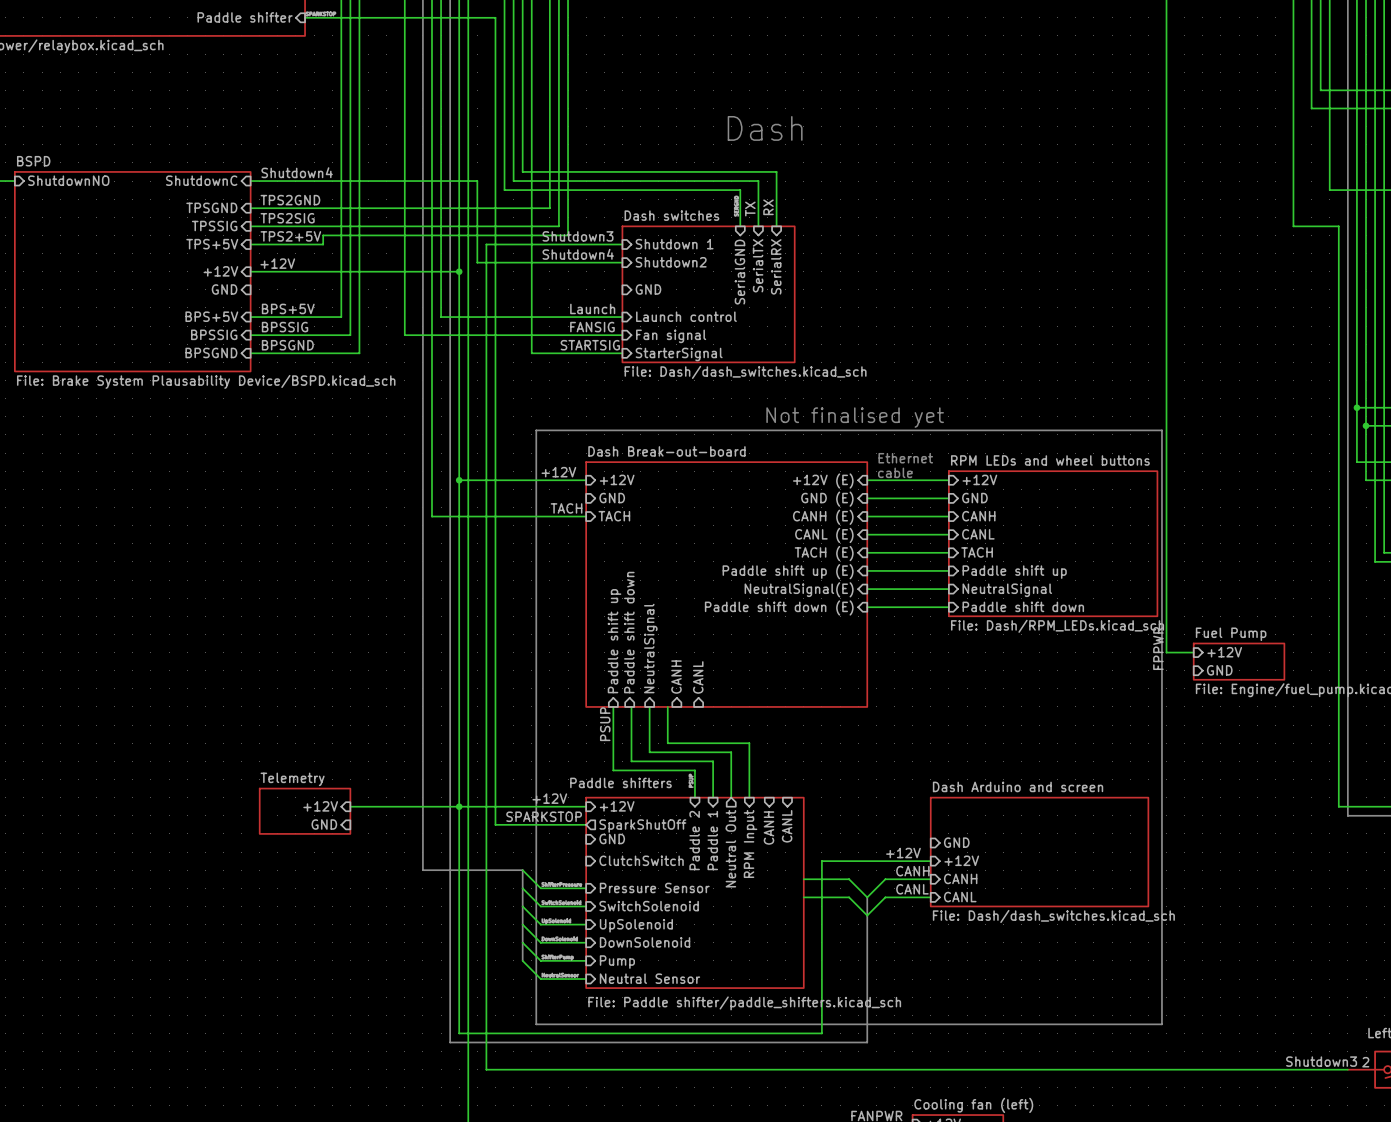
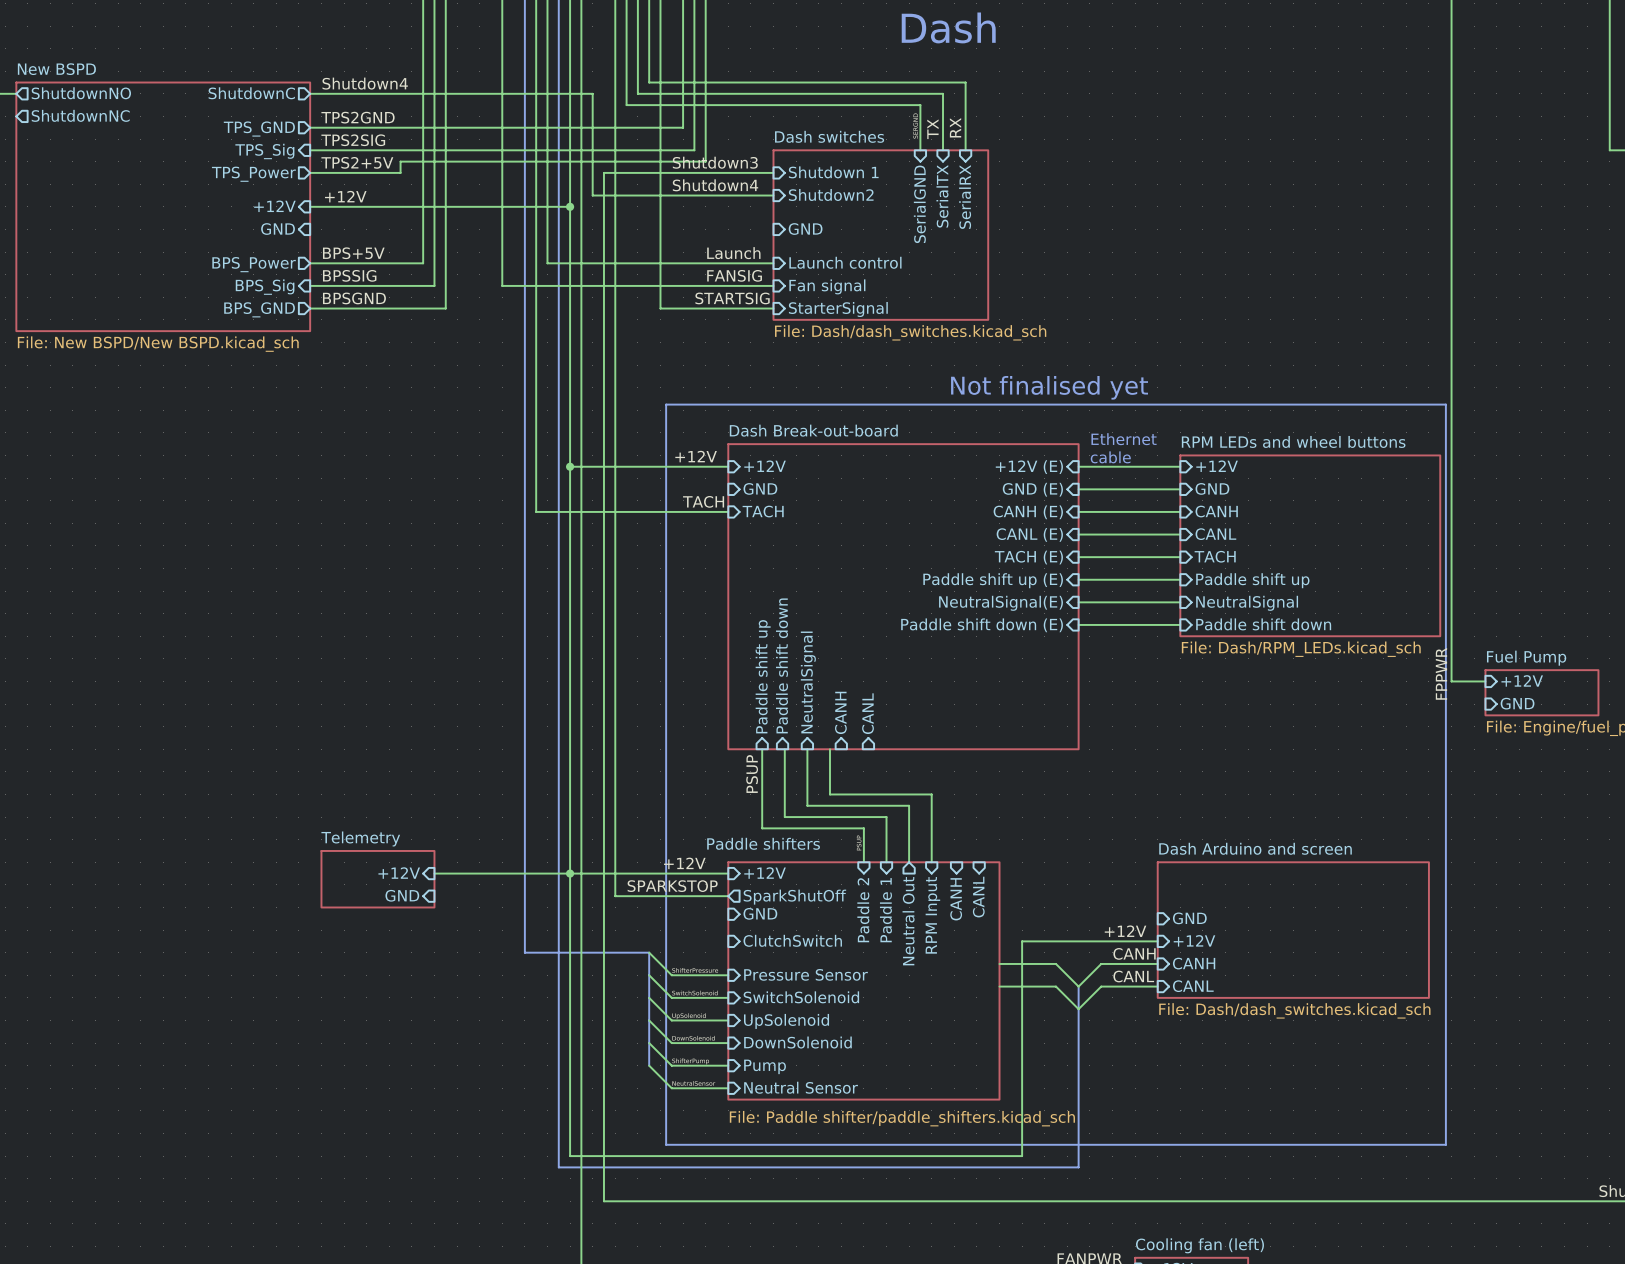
sheet BSPD name: BSPD (33, 161) -> New BSPD (56, 69)
sheet pin shape: input (68, 180) -> output (81, 93)
sheet pin shape: input (201, 180) -> output (251, 93)
sheet pin: none -> ShutdownNC (80, 115)
sheet pin shape: input (211, 207) -> output (259, 129)
sheet pin: TPSGND (211, 207) -> TPS_GND (259, 129)
sheet pin: TPSSIG (214, 226) -> TPS_Sig (264, 151)
sheet pin shape: input (212, 244) -> output (253, 174)
sheet pin: TPS+5V (212, 244) -> TPS_Power (253, 174)
sheet pin shape: input (211, 316) -> output (254, 264)
sheet pin: BPS+5V (211, 316) -> BPS_Power (254, 264)
sheet pin: BPSSIG (214, 334) -> BPS_Sig (265, 287)
sheet pin shape: input (211, 352) -> output (259, 309)
sheet pin: BPSGND (211, 352) -> BPS_GND (259, 309)
sheet BSPD value: File: Brake System Plausability Device/BSPD.kicad_sch (206, 381) -> File: New BSPD/New BSPD.kicad_sch (158, 344)

